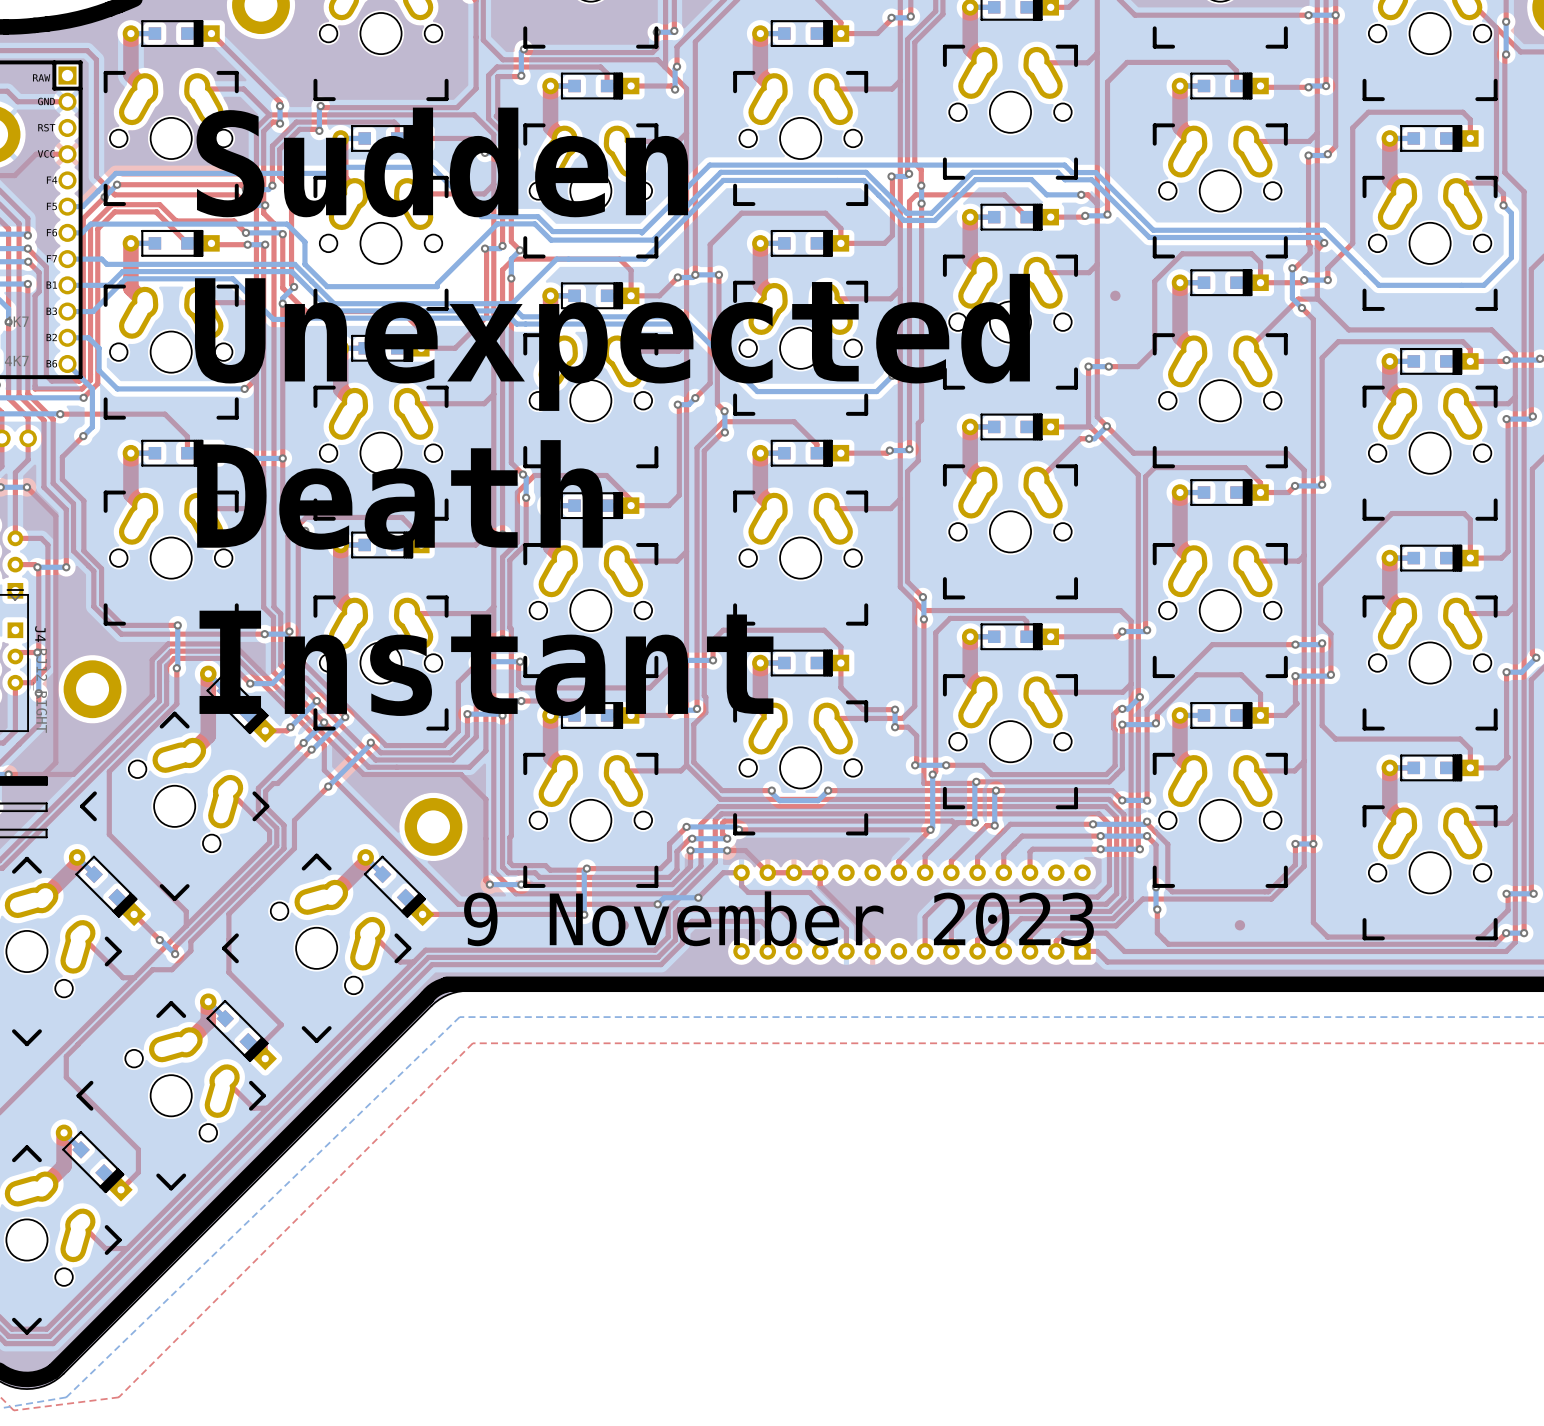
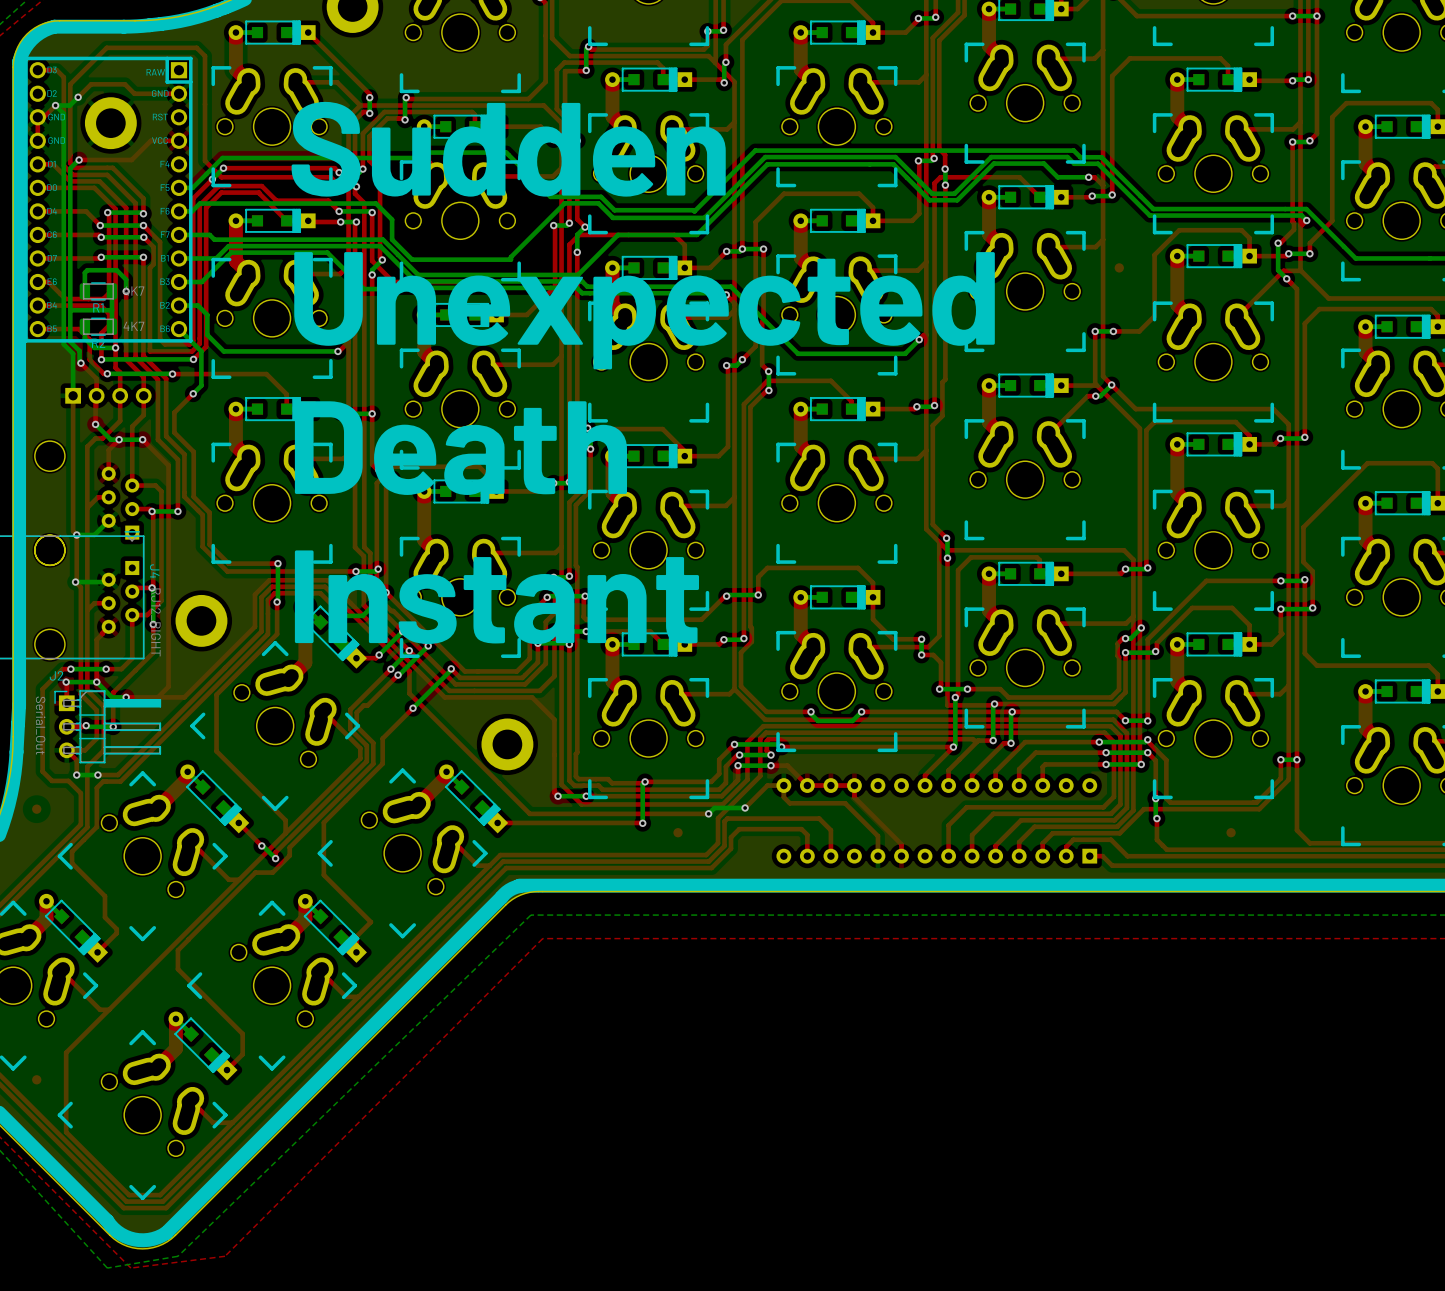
text: 9 November 2023 (778, 918) -> none

